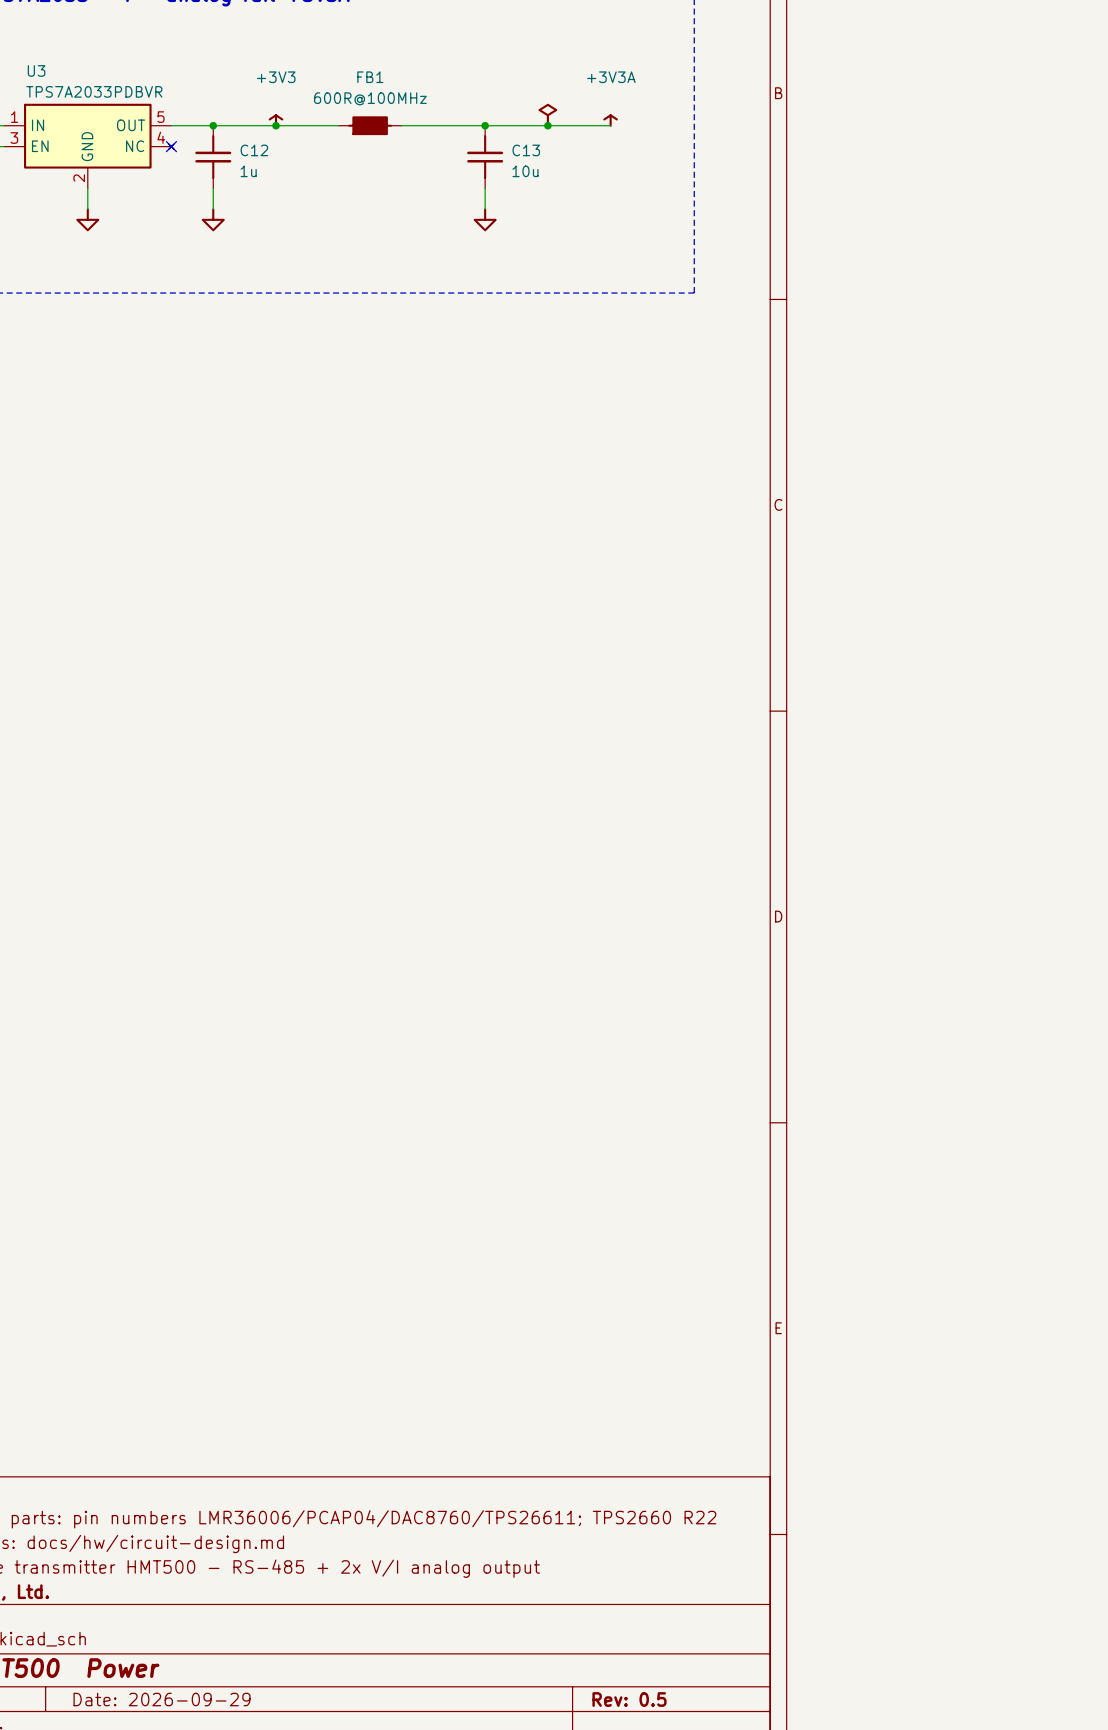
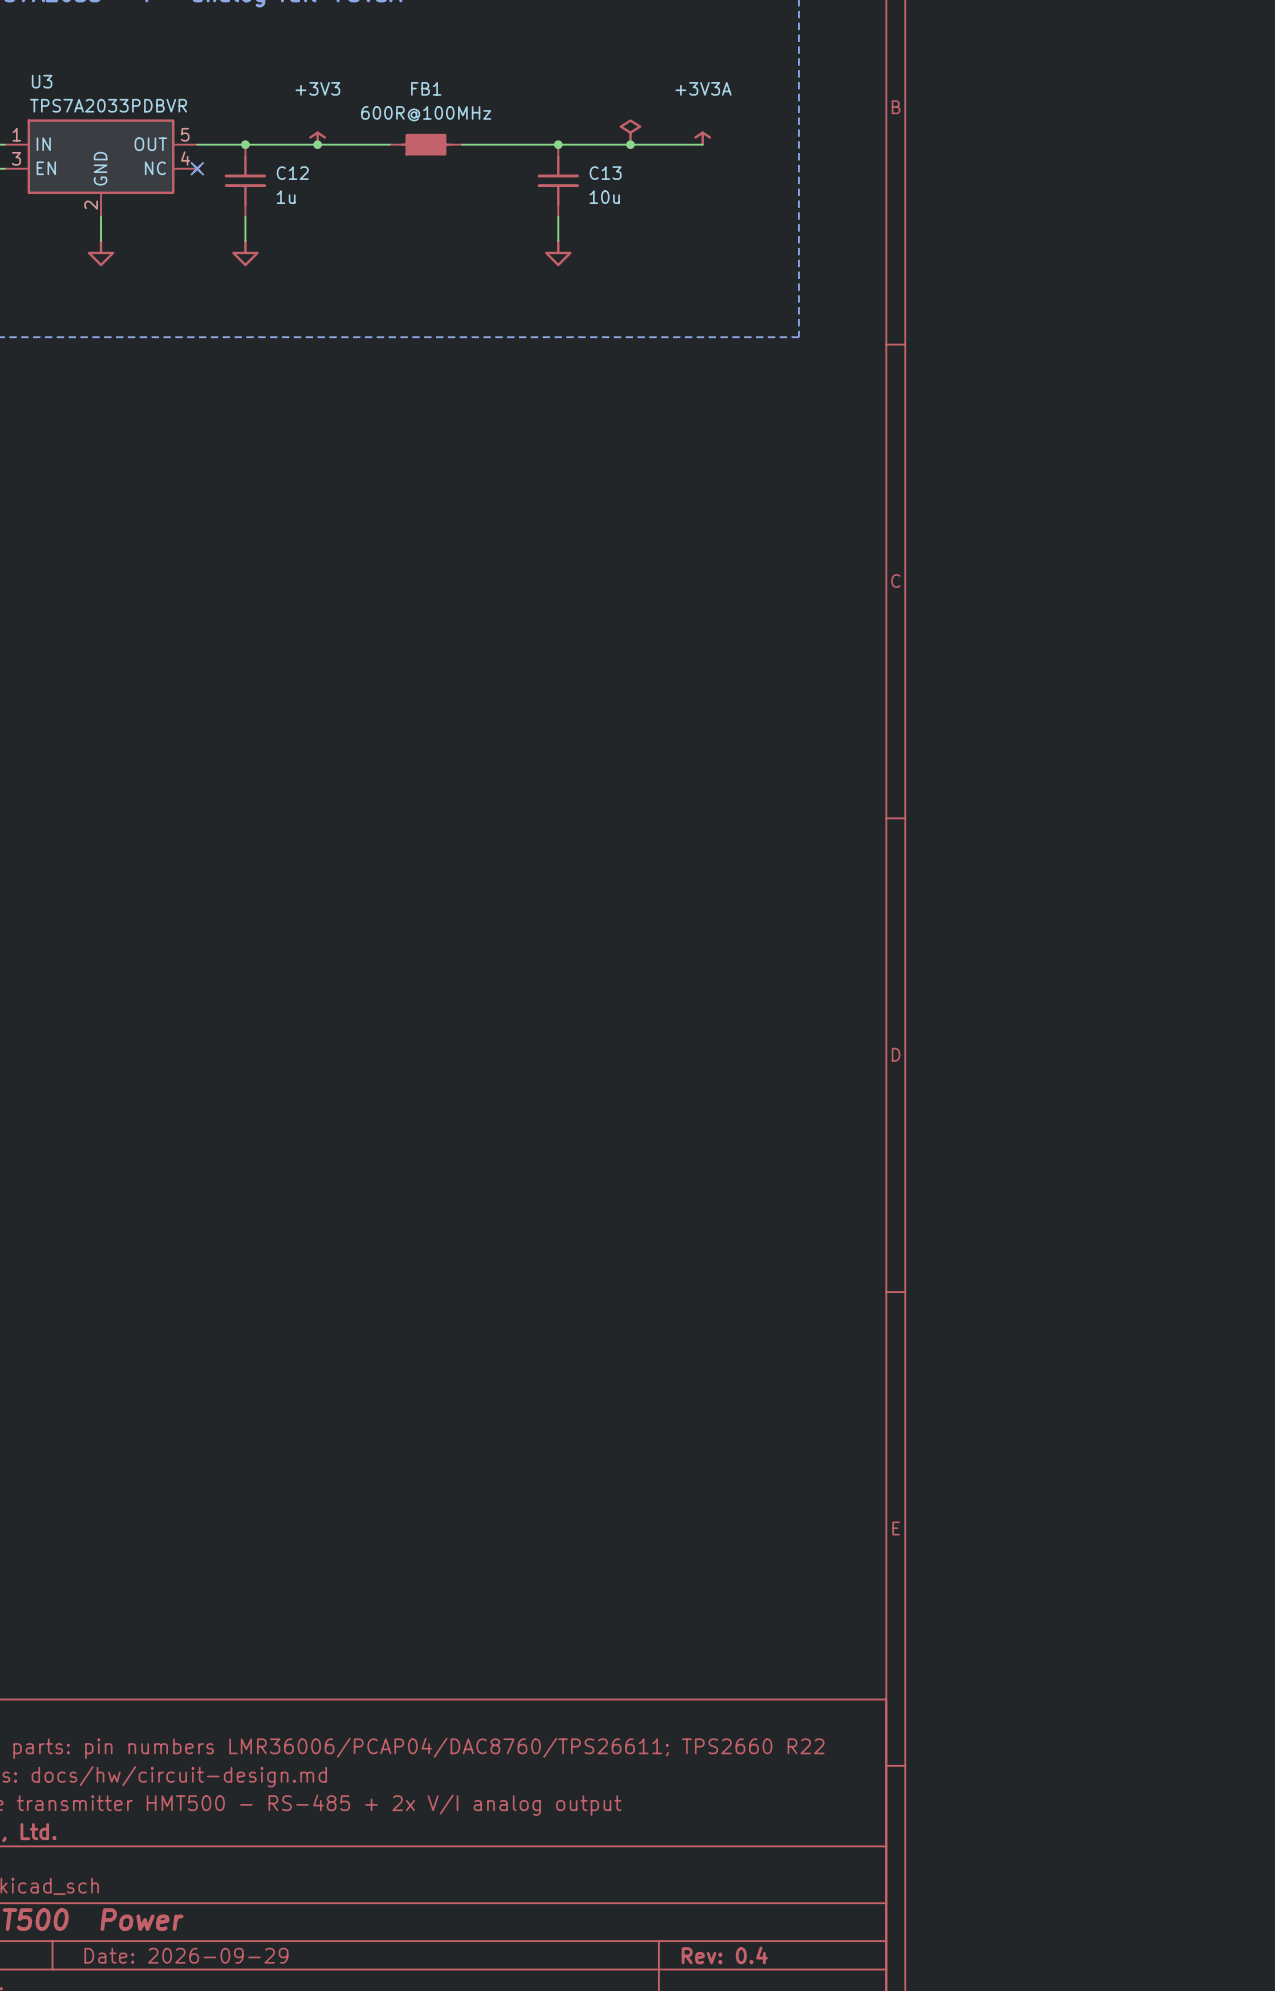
title block: Rev: 0.5 (629, 1699) -> Rev: 0.4 (724, 1955)

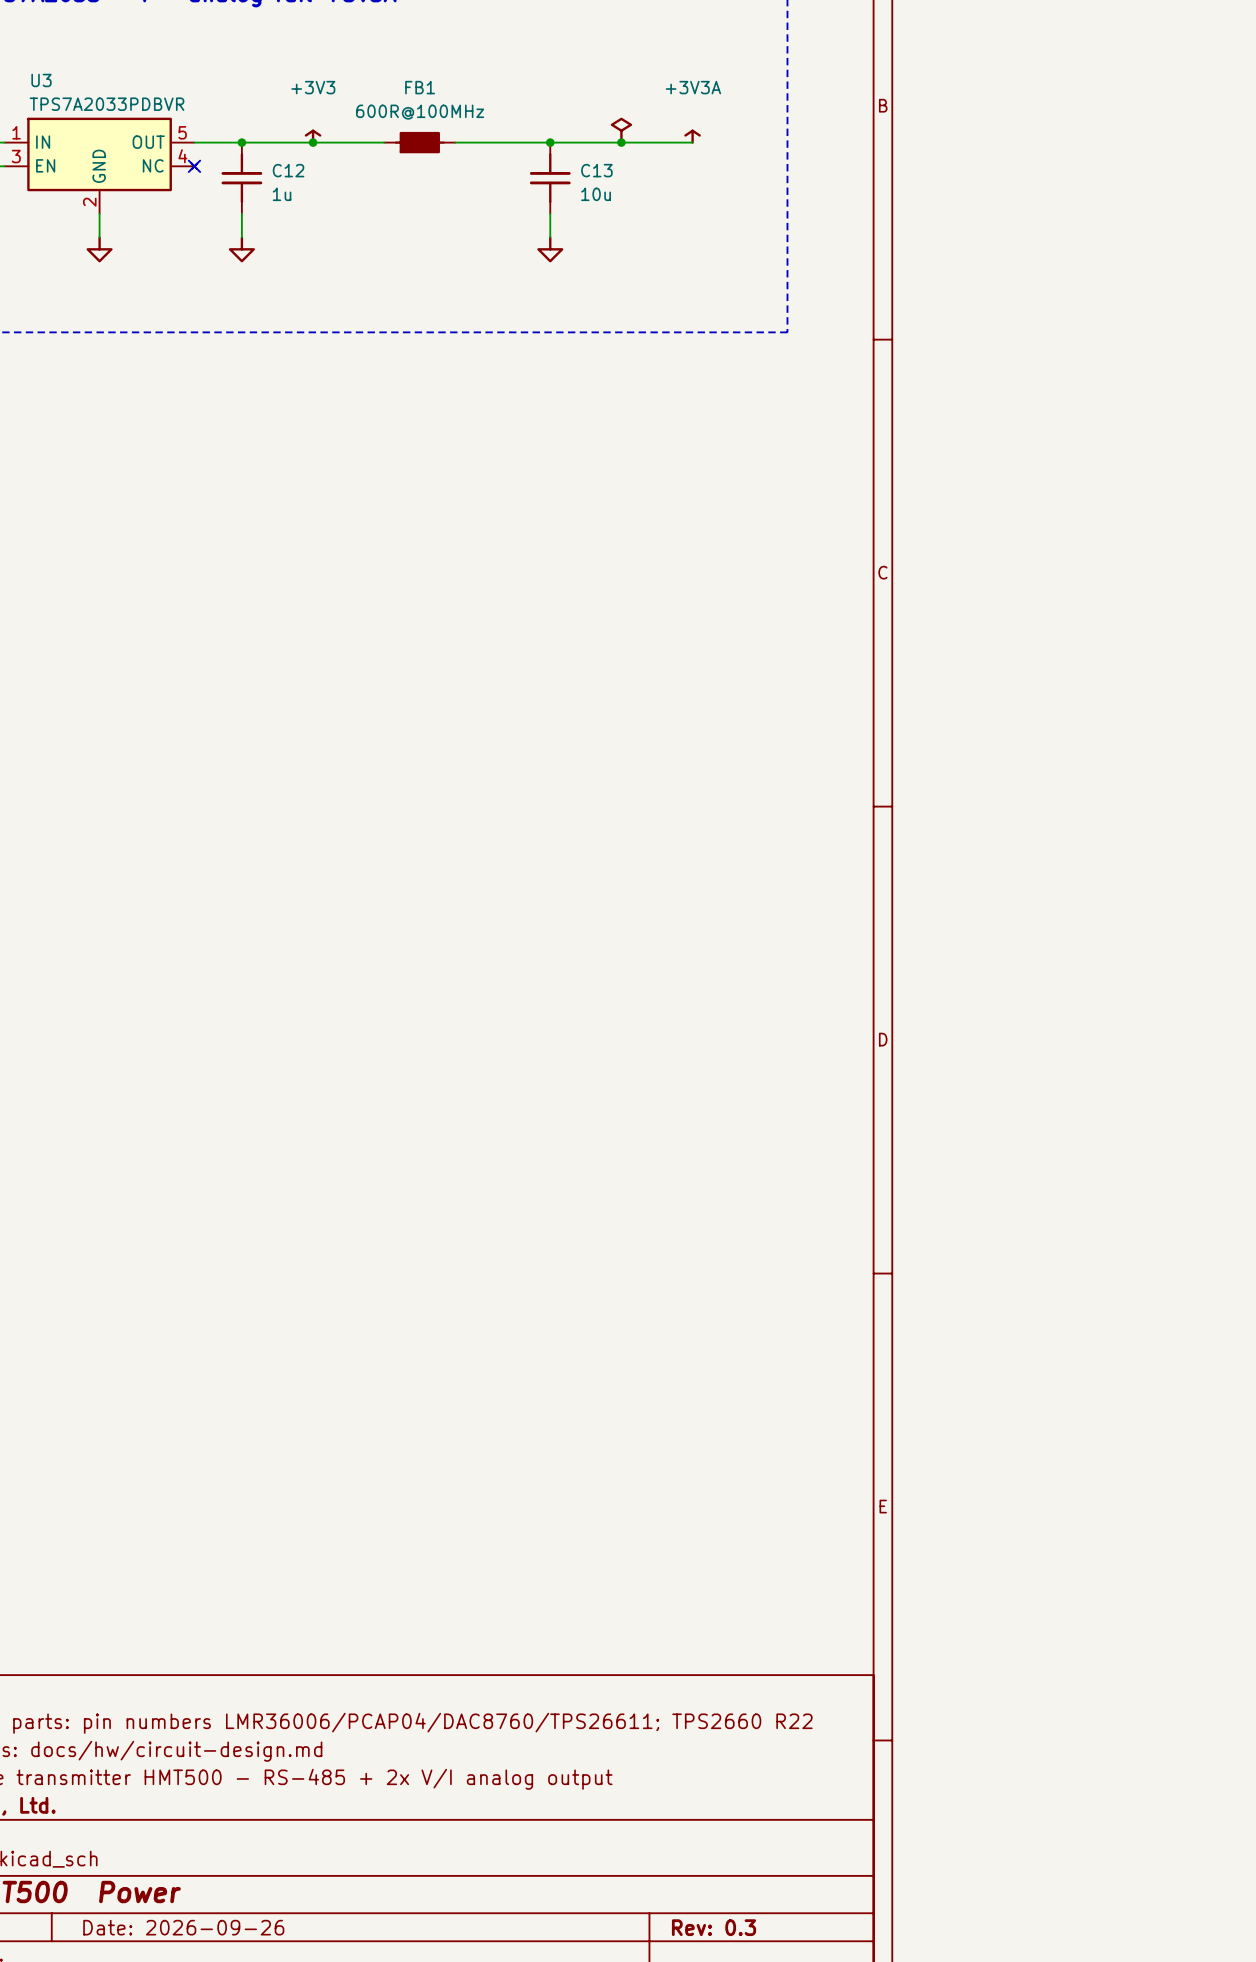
title block: Date: 2026-09-29 (186, 1955) -> Date: 2026-09-26 (183, 1927)
title block: Rev: 0.4 (724, 1955) -> Rev: 0.3 (714, 1927)

